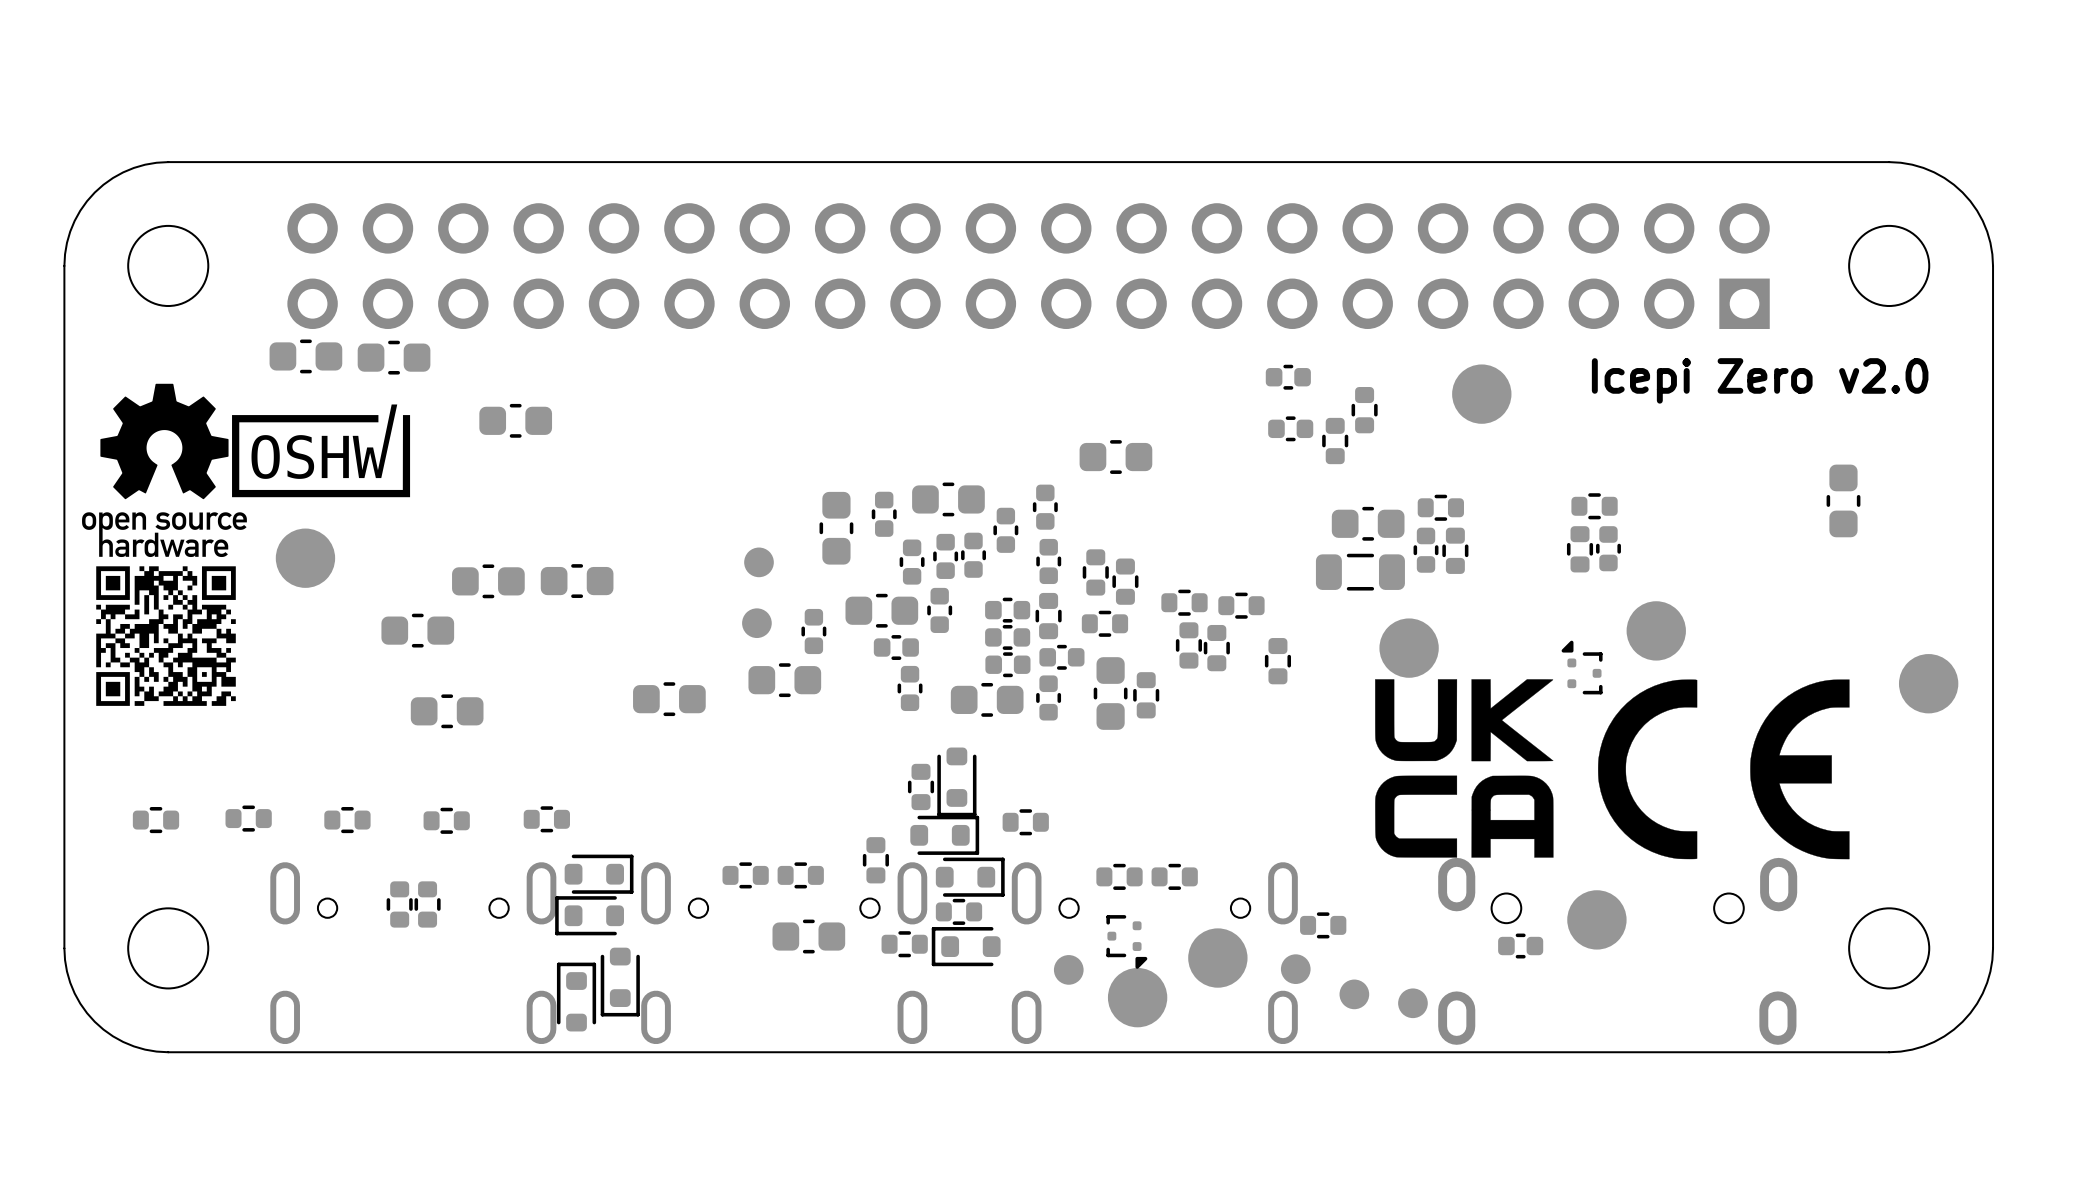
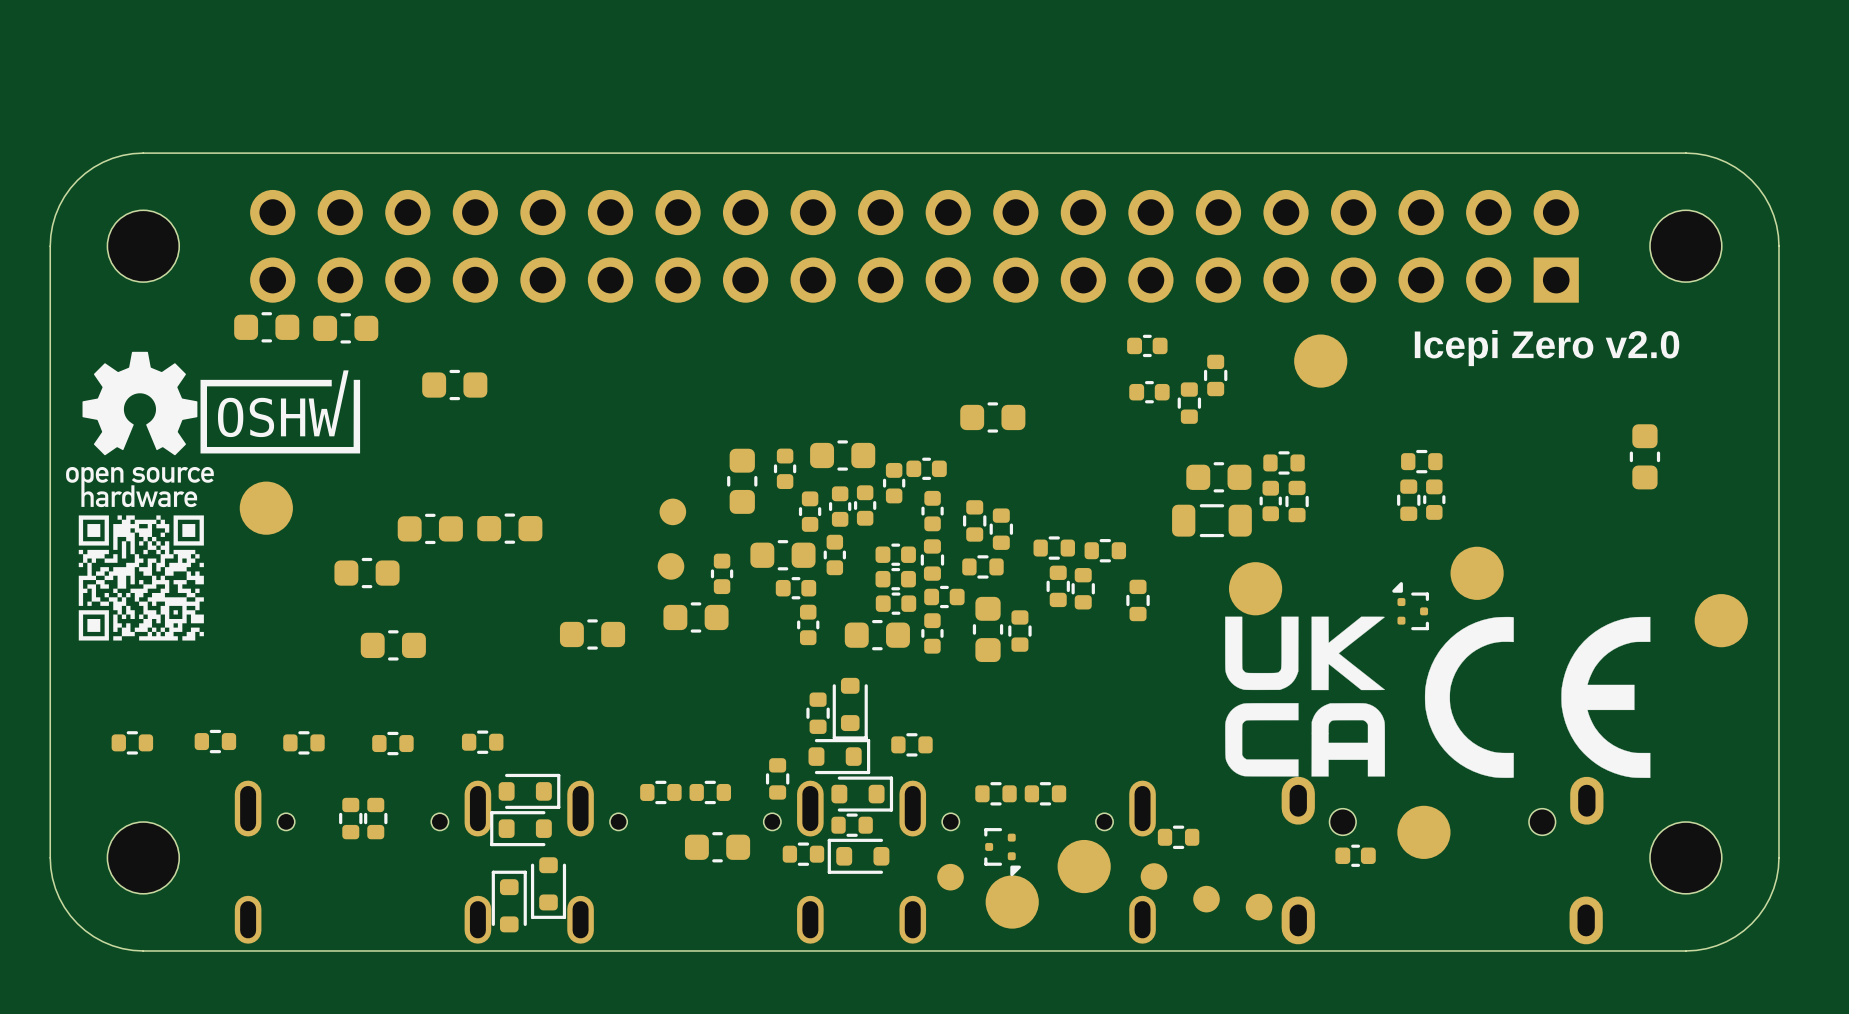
part rotation: 0° (1045, 507) -> 90° clockwise (926, 468)

